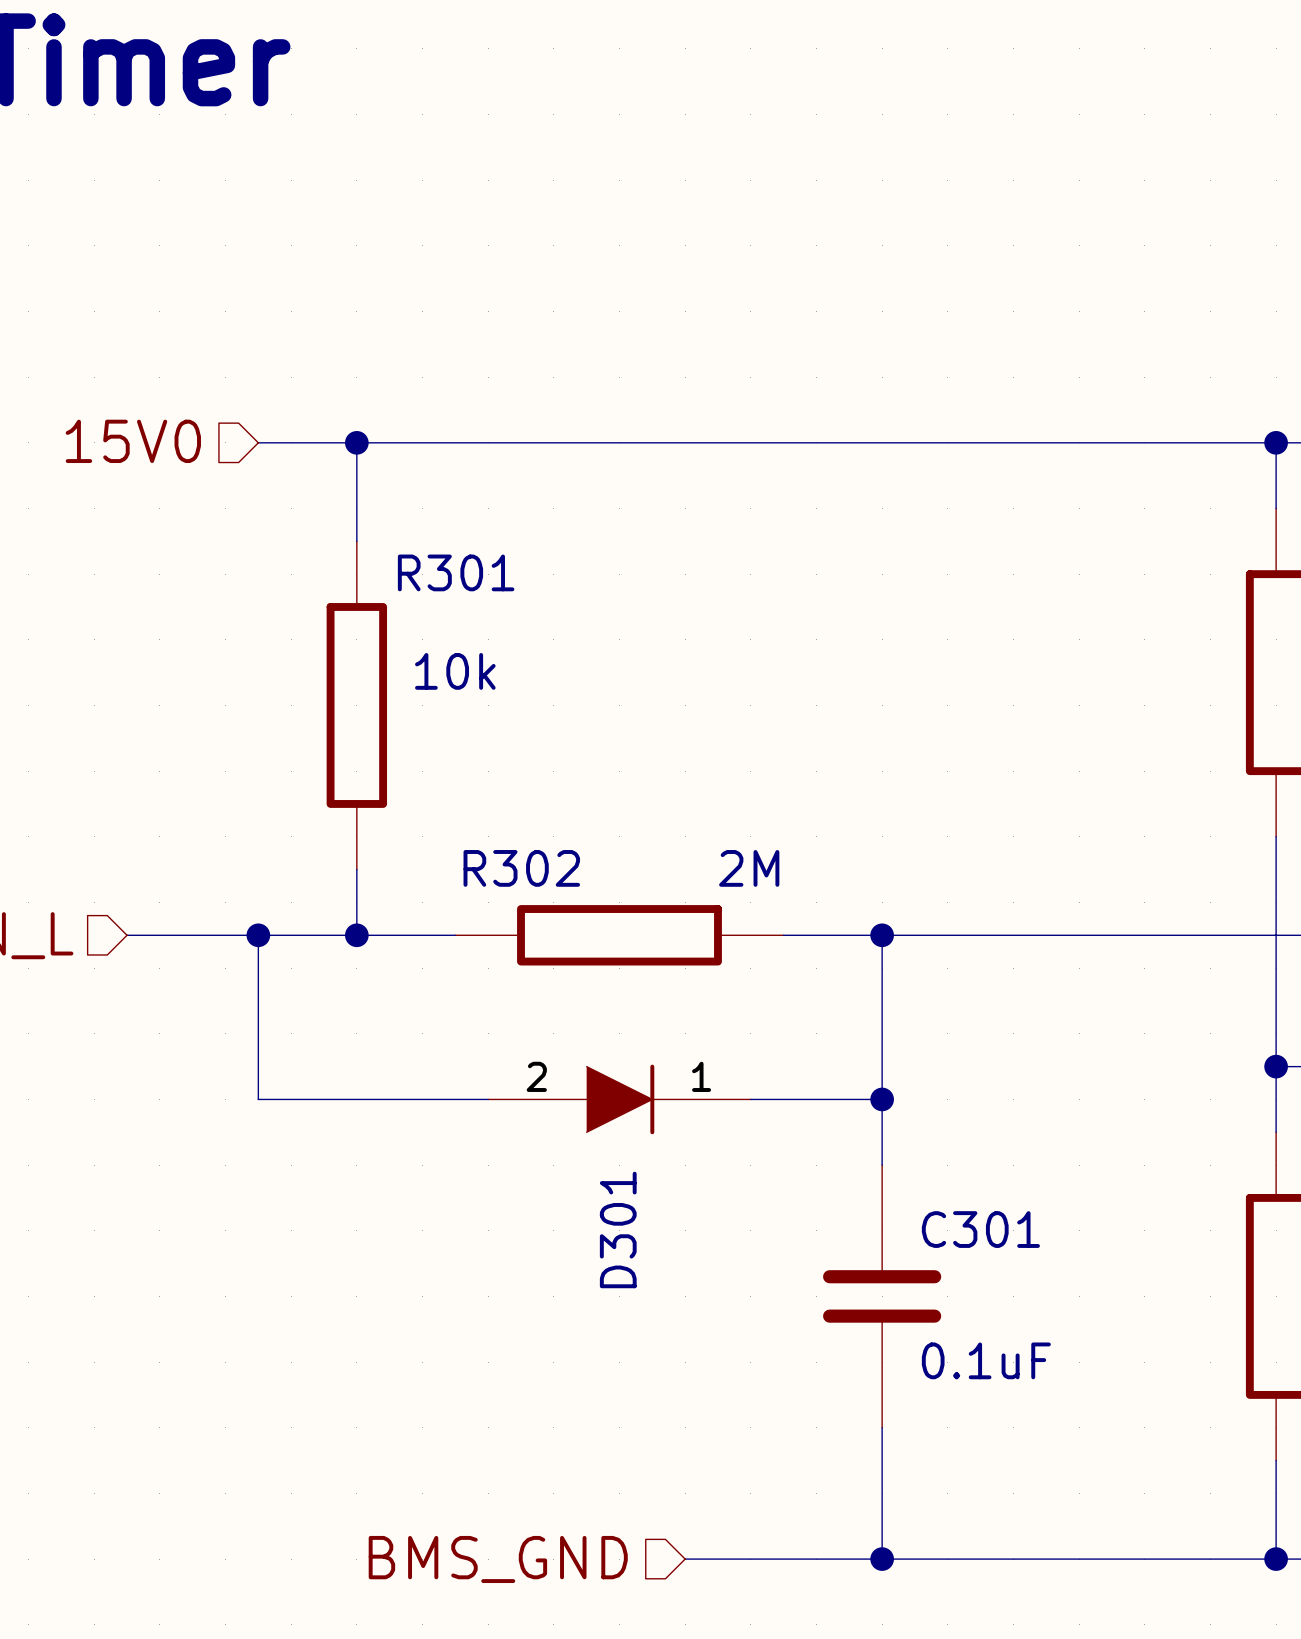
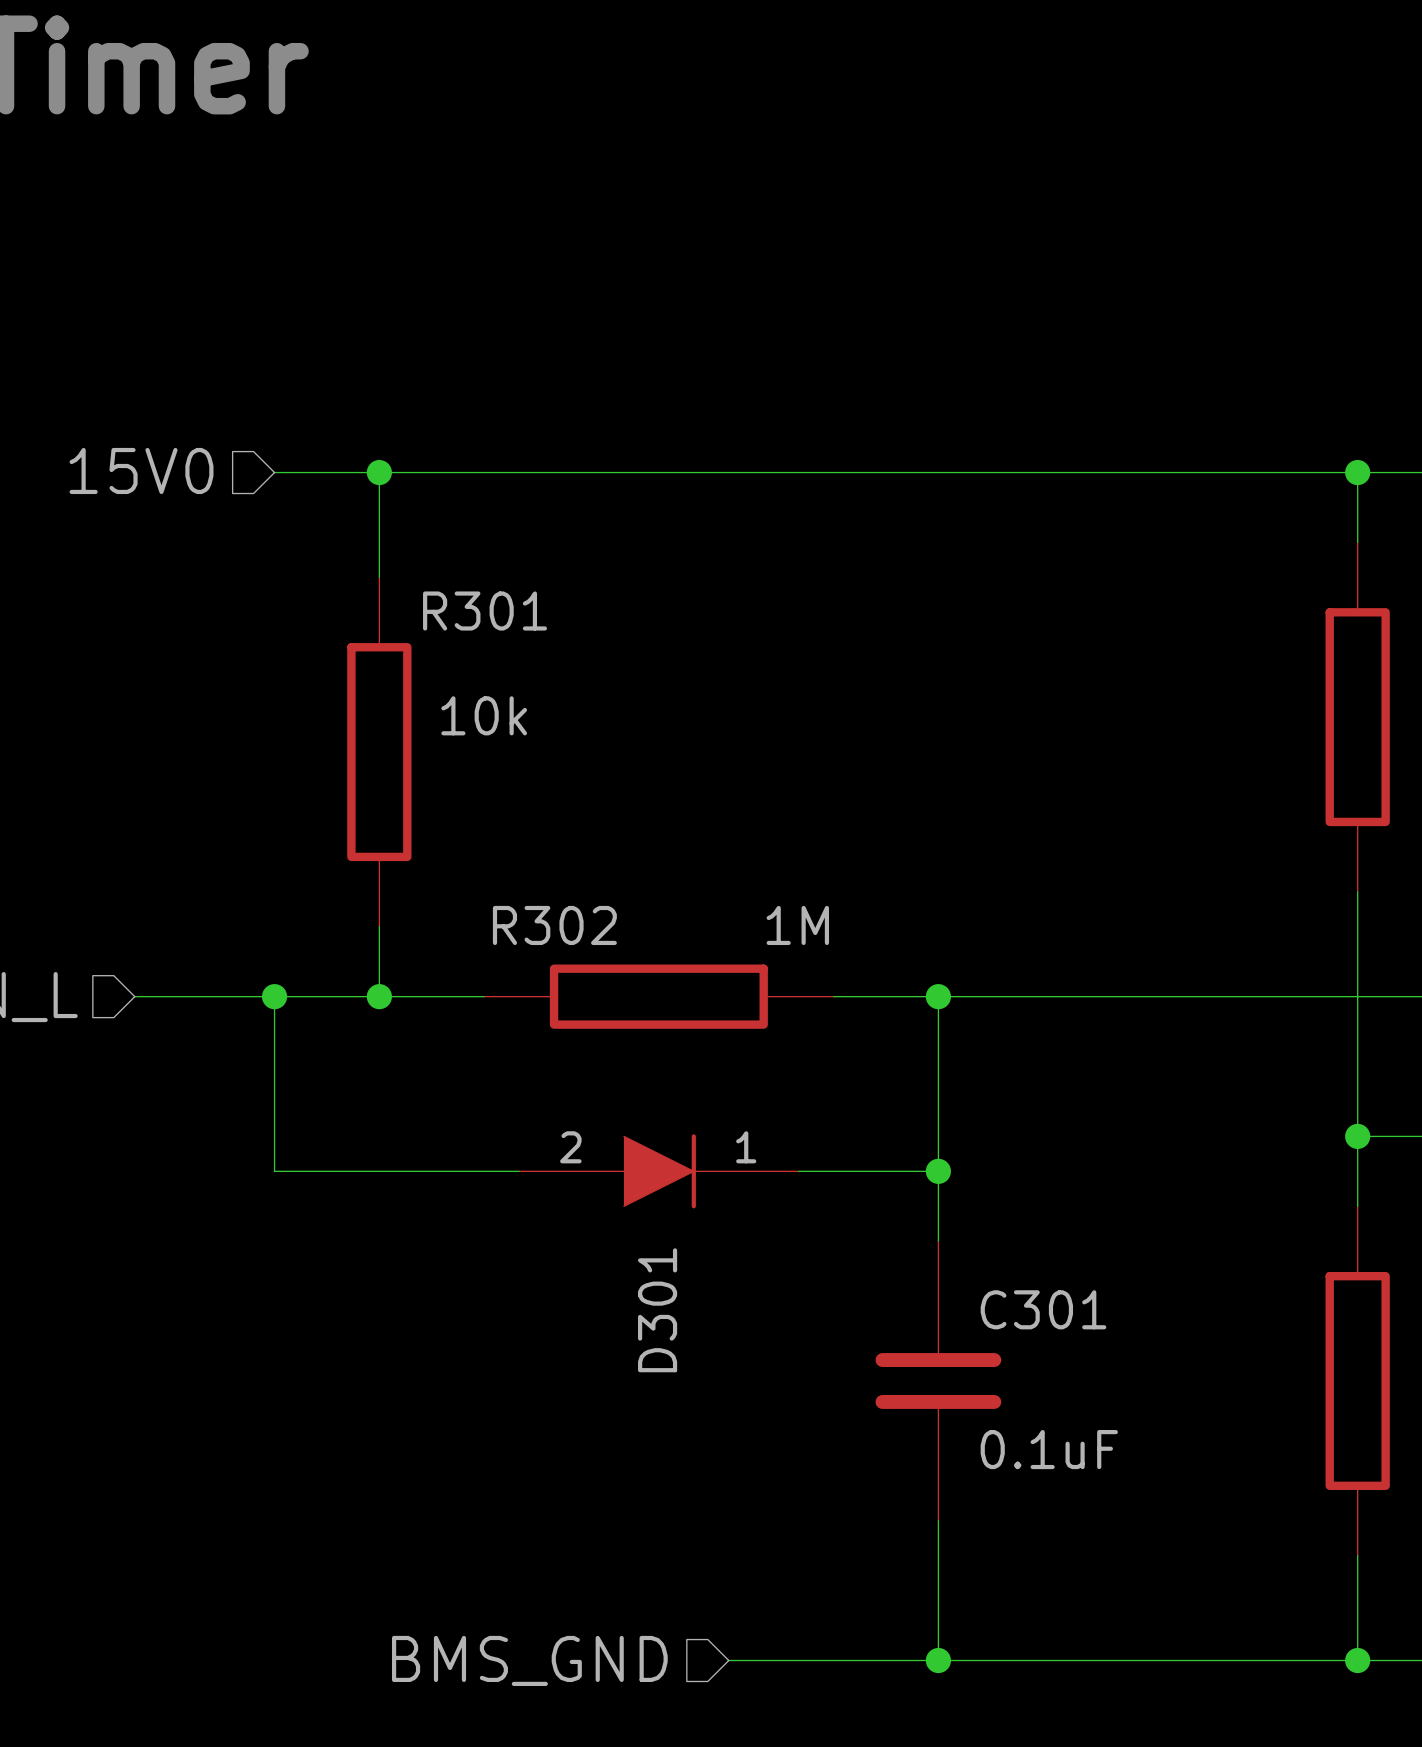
R302 value: 2M (749, 868) -> 1M (797, 925)

